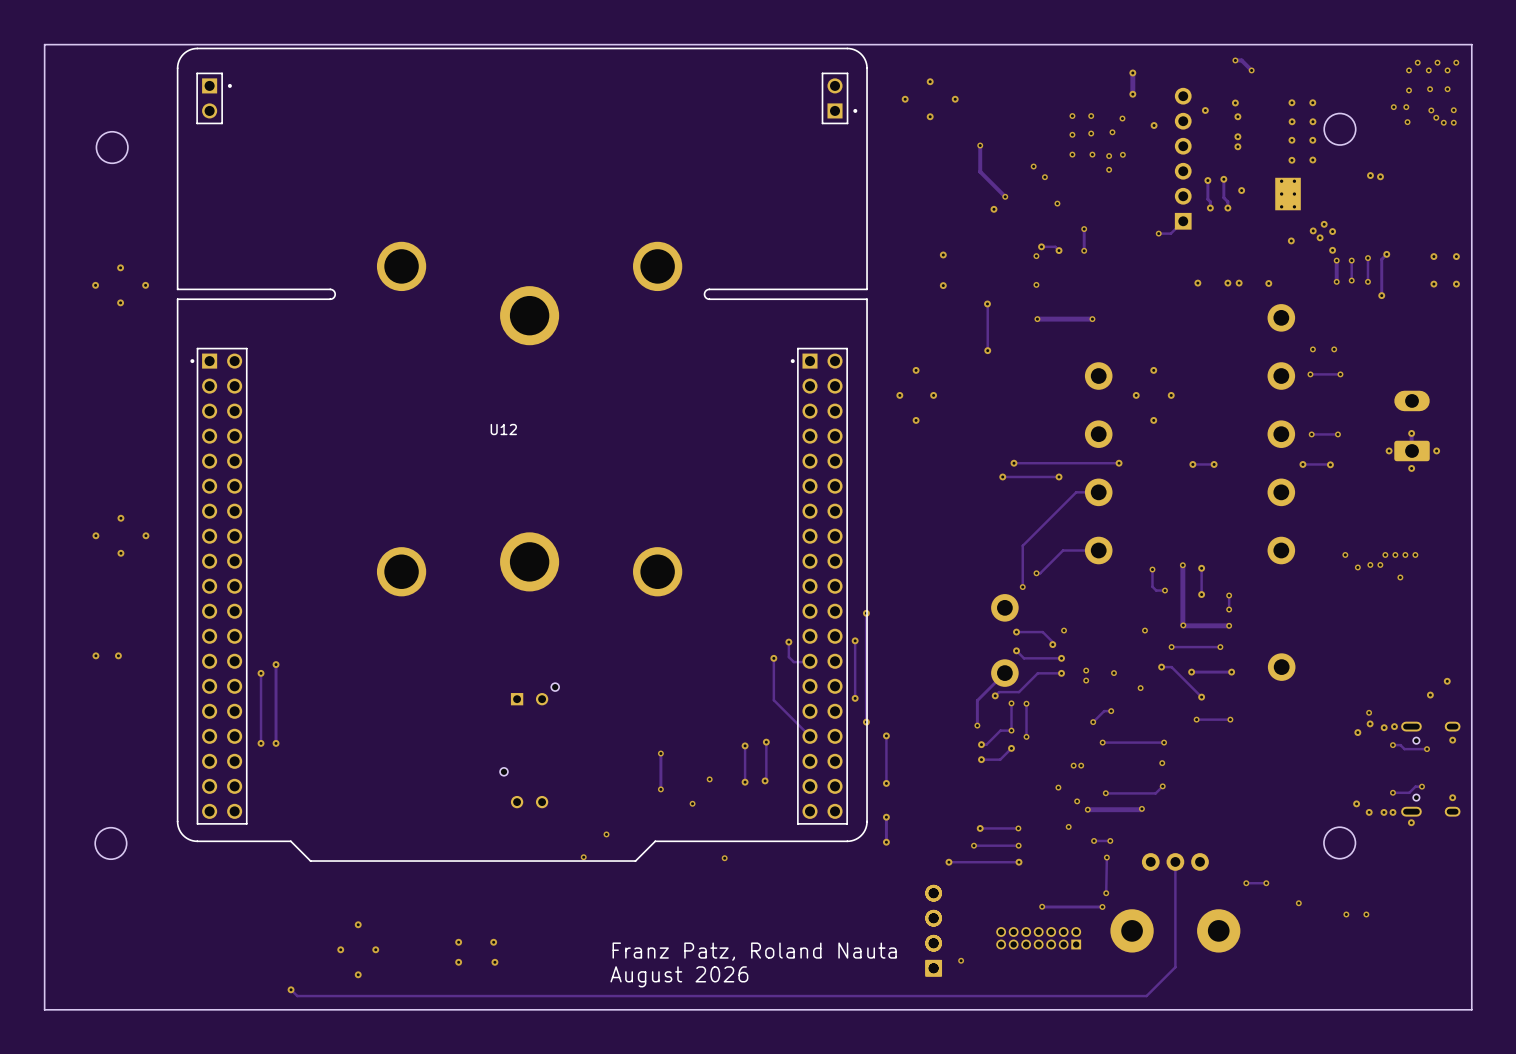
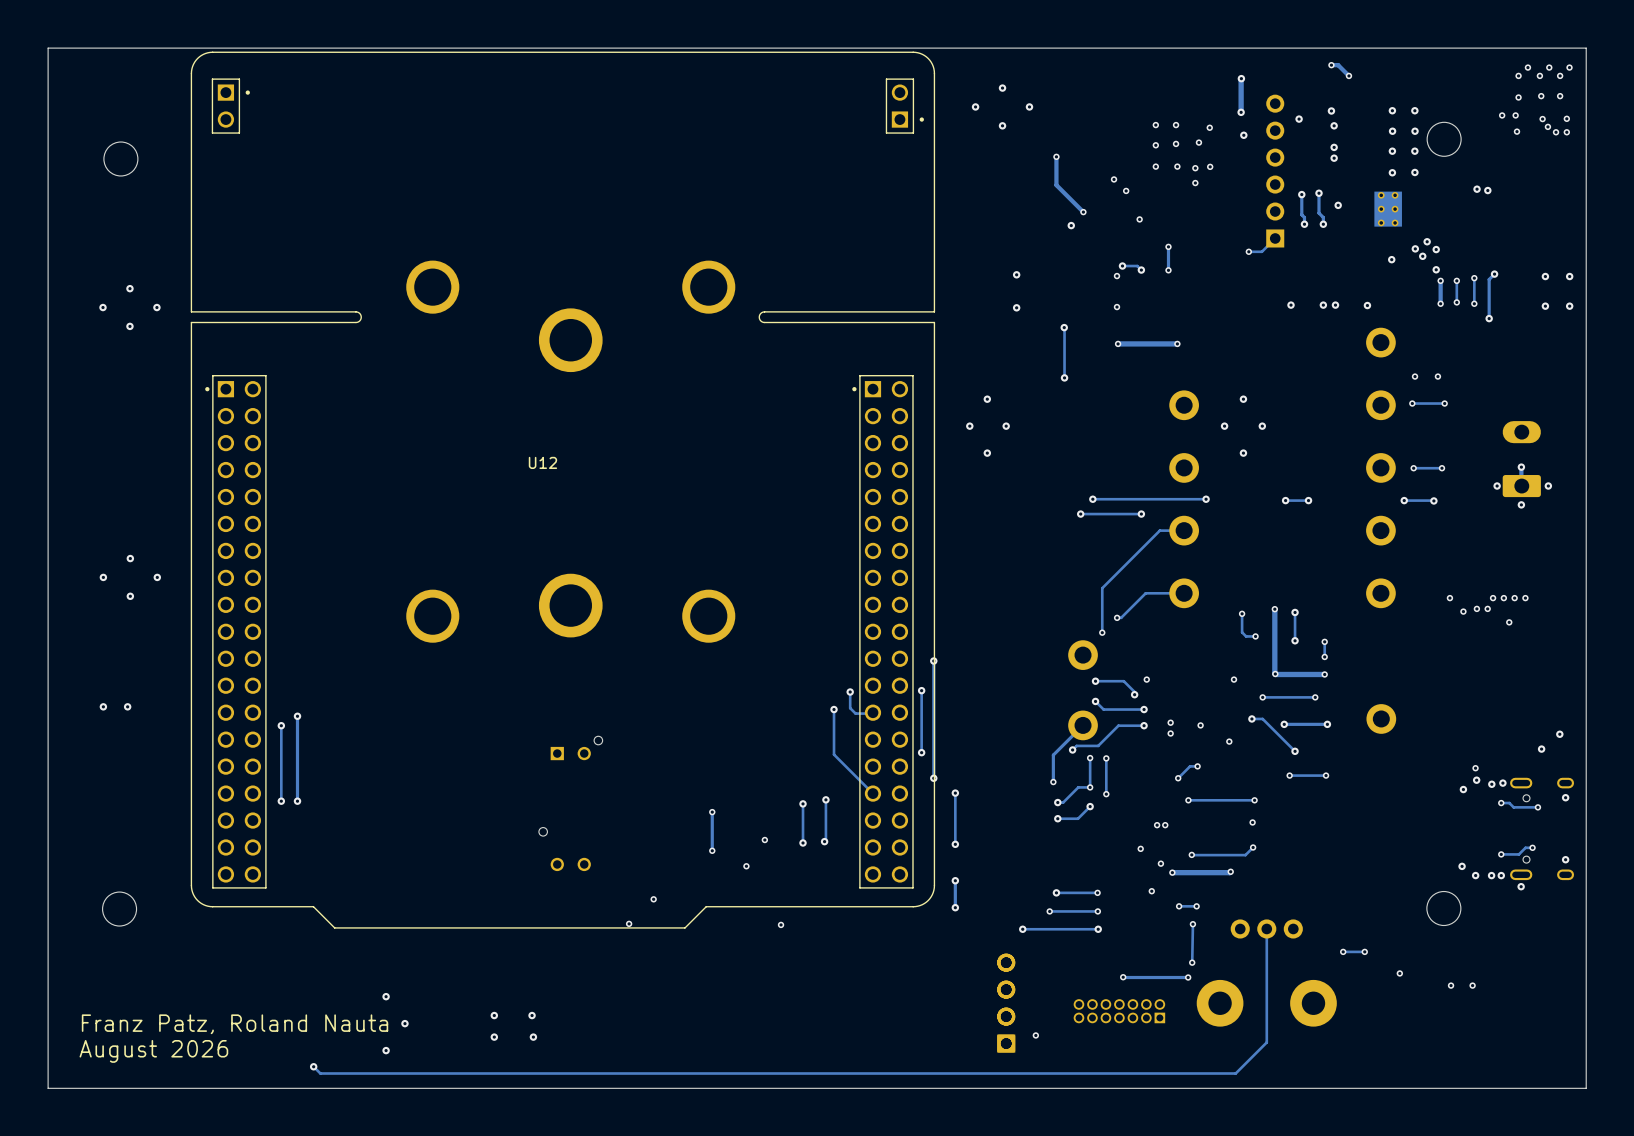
track: (1132, 72) (1132, 94) -> none
via: (1132, 72) -> none
track: none -> (1241, 78) (1241, 112)
via: none -> (1241, 78)
via: (1132, 94) -> none
via: none -> (1241, 112)
via: (340, 949) -> none
text: none -> Franz Patz, Roland Nauta (235, 1024)
text: Franz Patz, Roland Nauta (754, 951) -> none
text: none -> August 2026 (153, 1051)
text: August 2026 (679, 976) -> none

